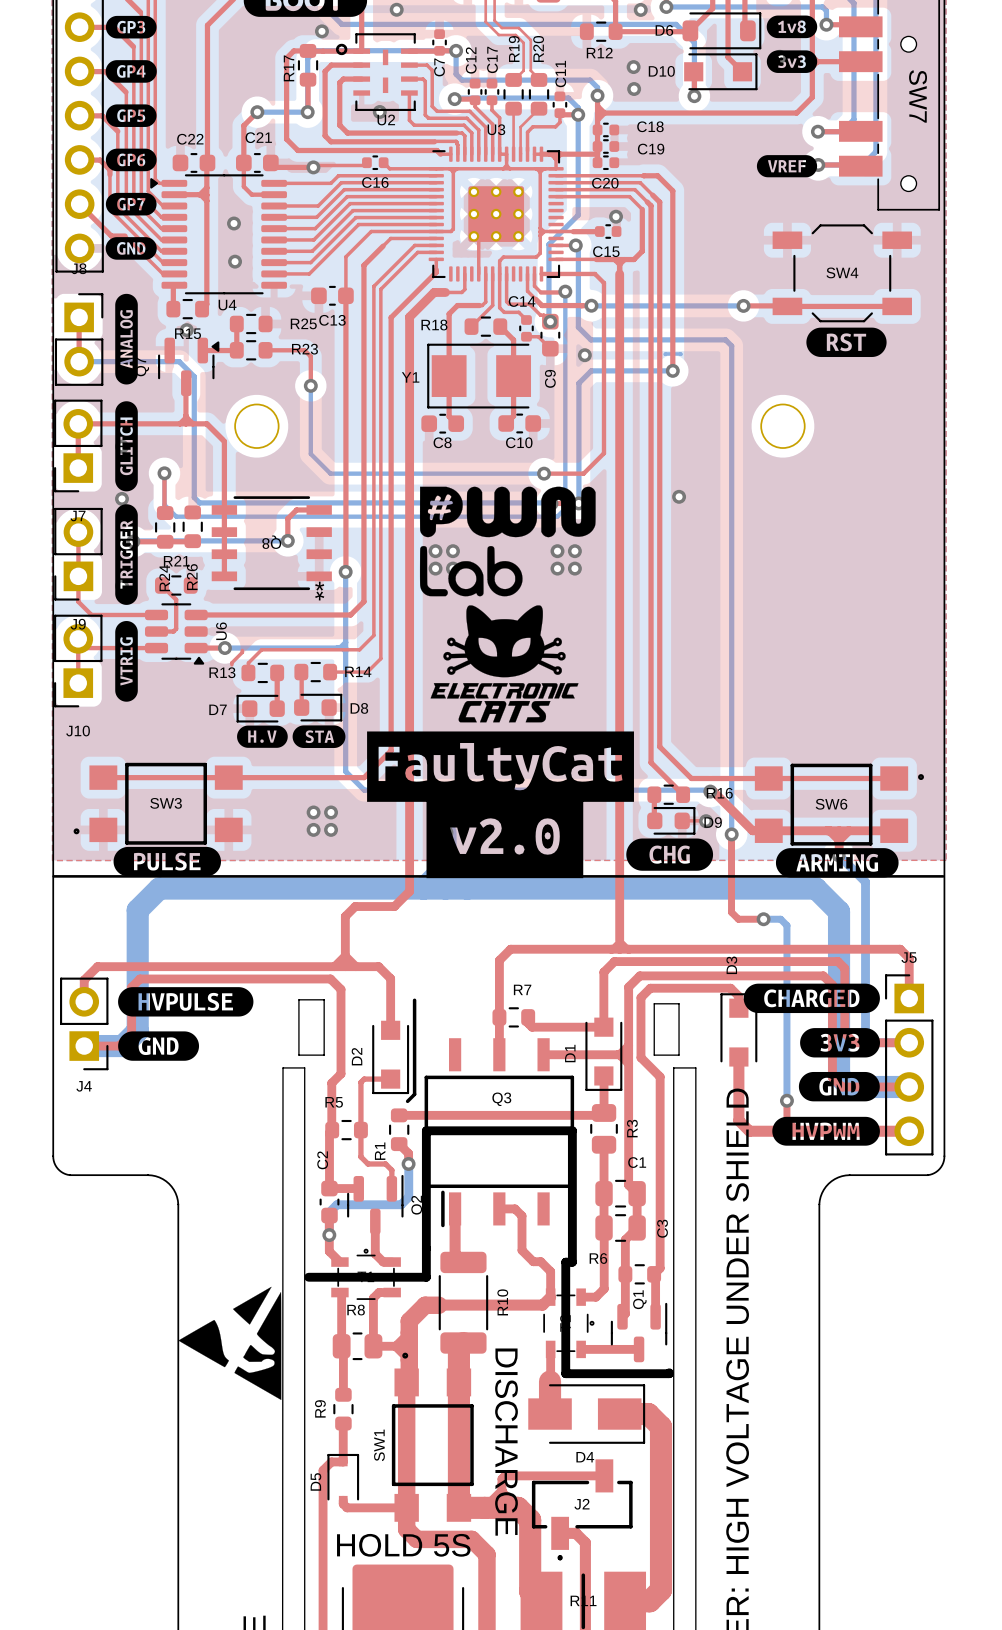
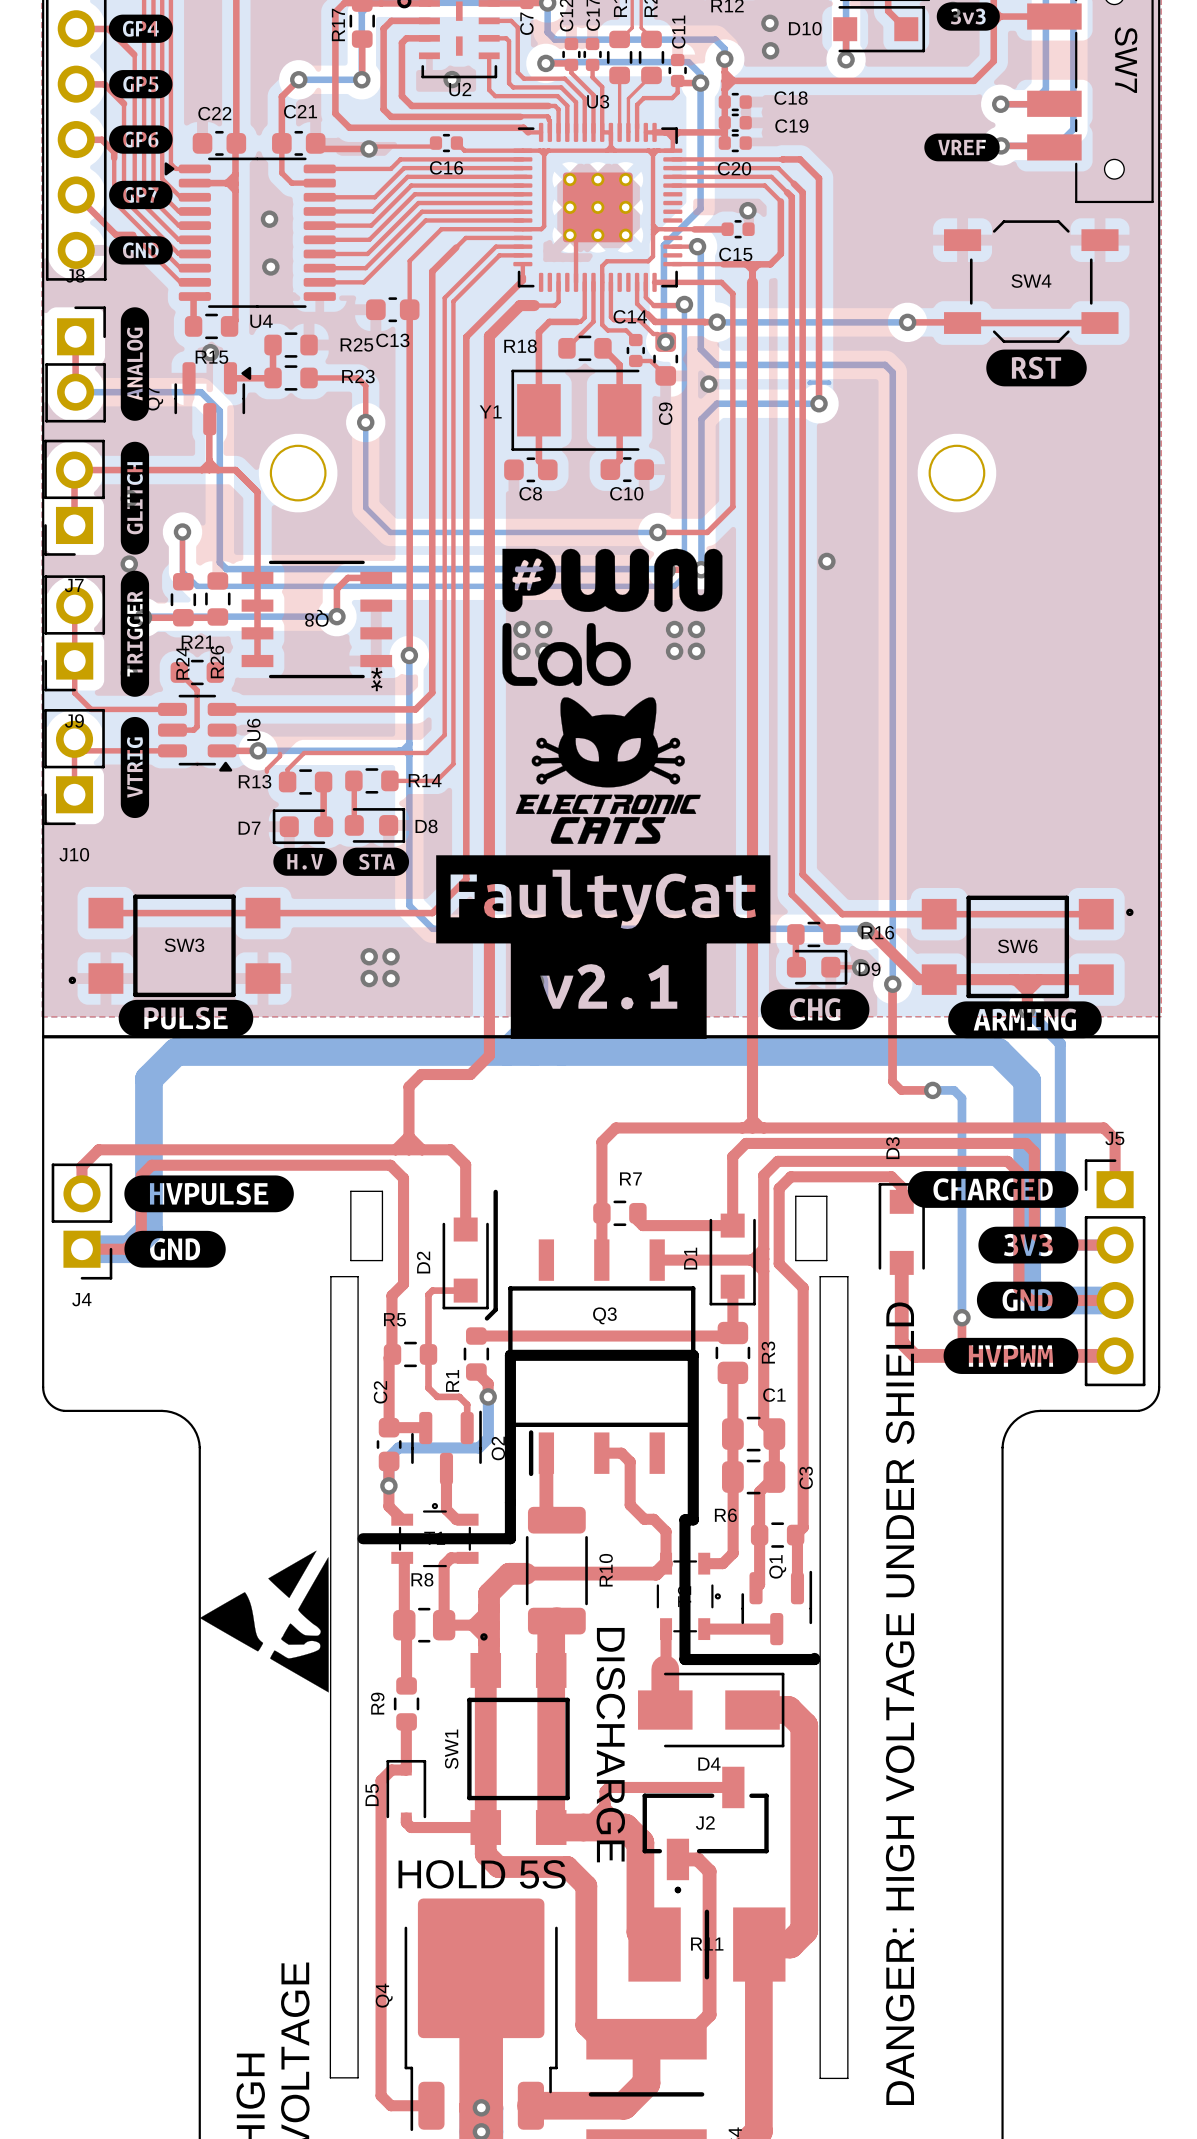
drawing shape: [426, 794, 584, 879] -> [510, 934, 707, 1039]

